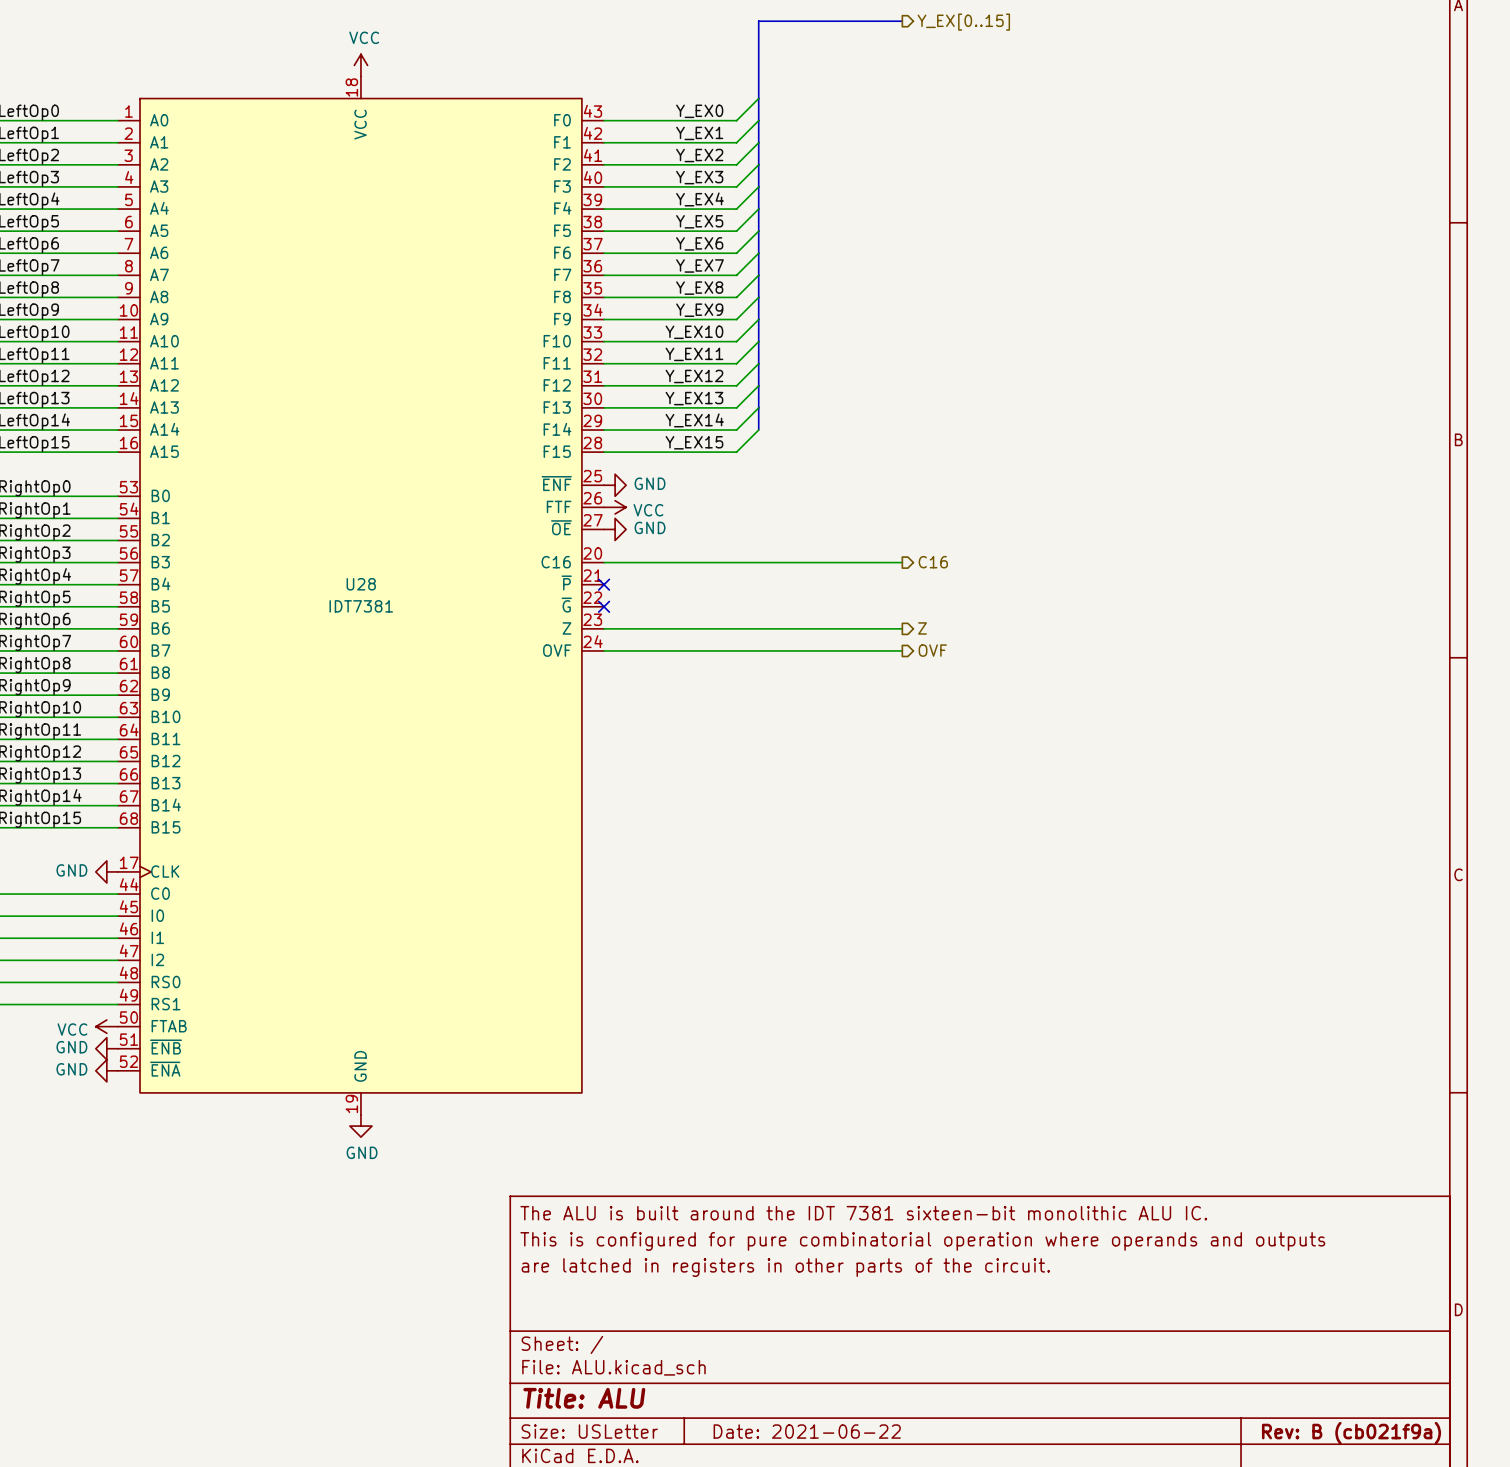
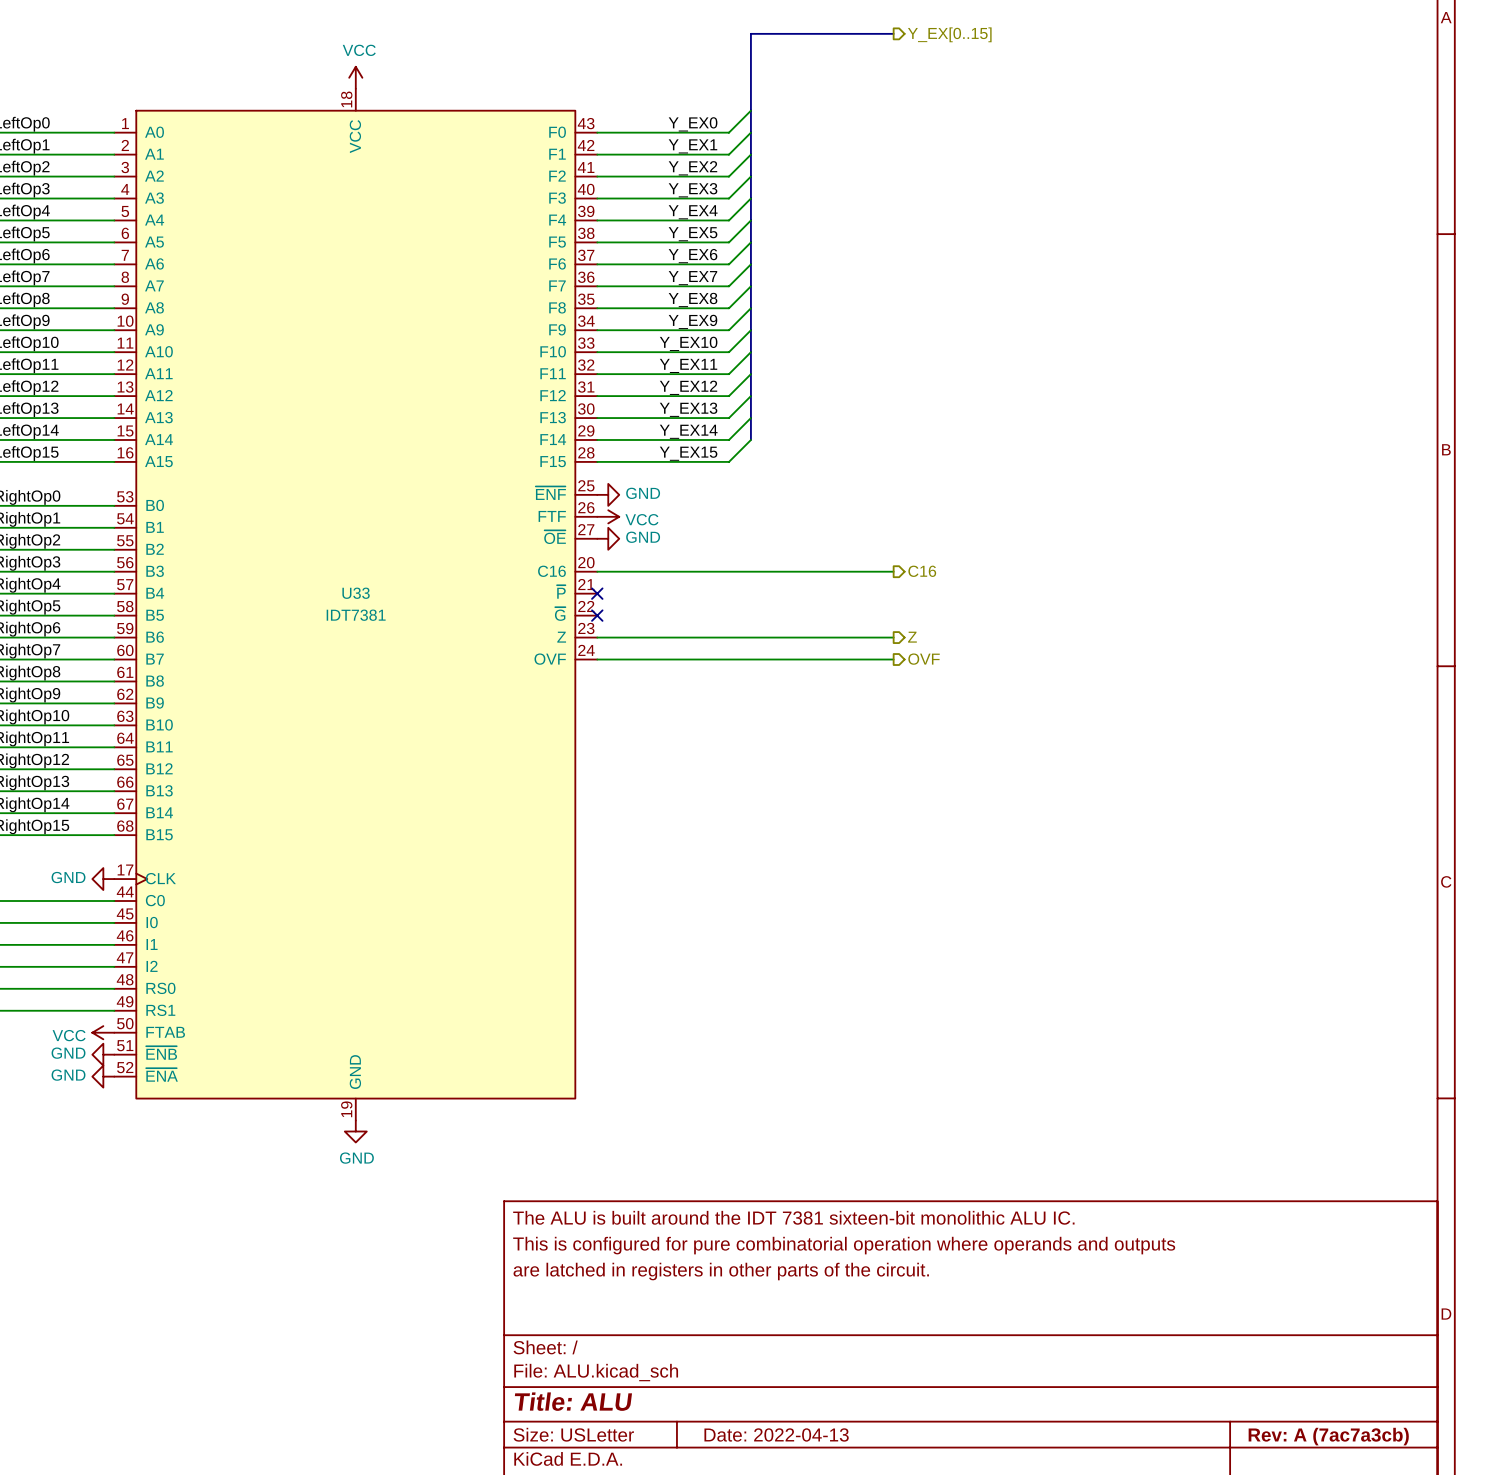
U28 name: U28 (361, 584) -> U33 (356, 593)
title block: Date: 2021-06-22 (807, 1431) -> Date: 2022-04-13 (776, 1434)
title block: Rev: B (cb021f9a) (1351, 1433) -> Rev: A (7ac7a3cb) (1328, 1436)

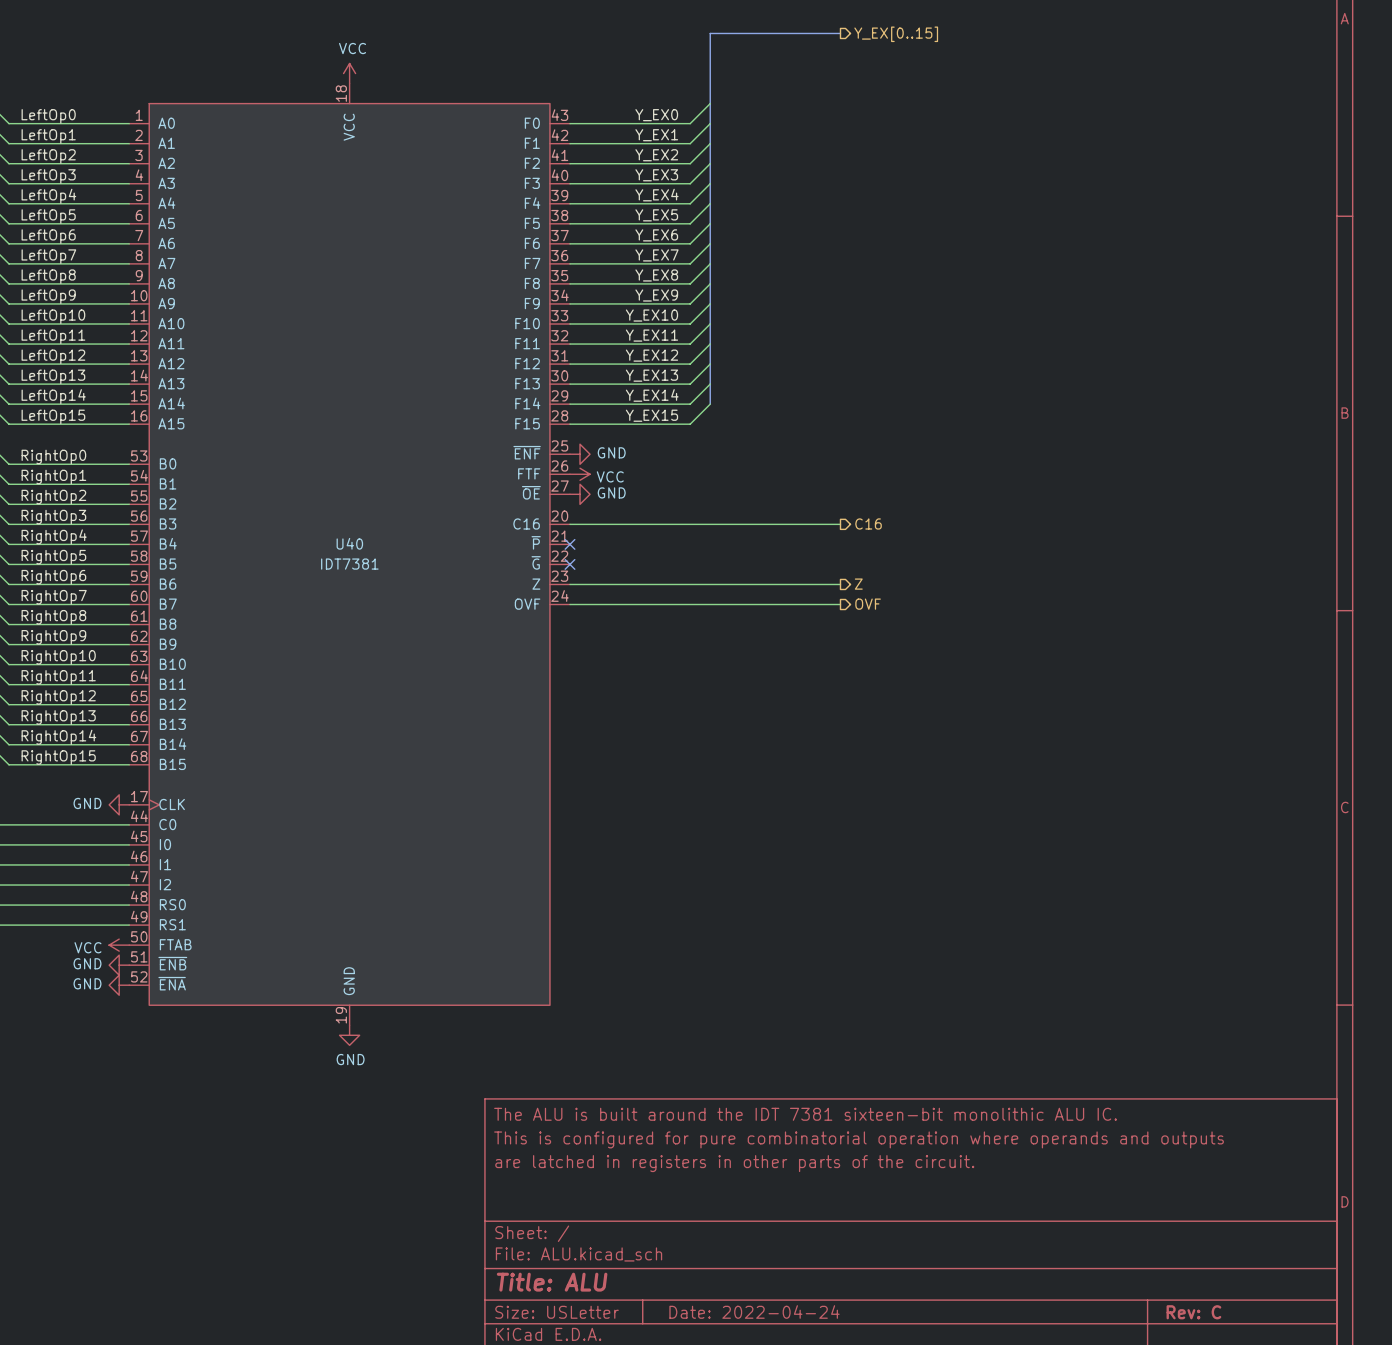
U33 name: U33 (356, 593) -> U40 (349, 543)
title block: Date: 2022-04-13 (776, 1434) -> Date: 2022-04-24 (754, 1311)
title block: Rev: A (7ac7a3cb) (1328, 1436) -> Rev: C (1193, 1312)

